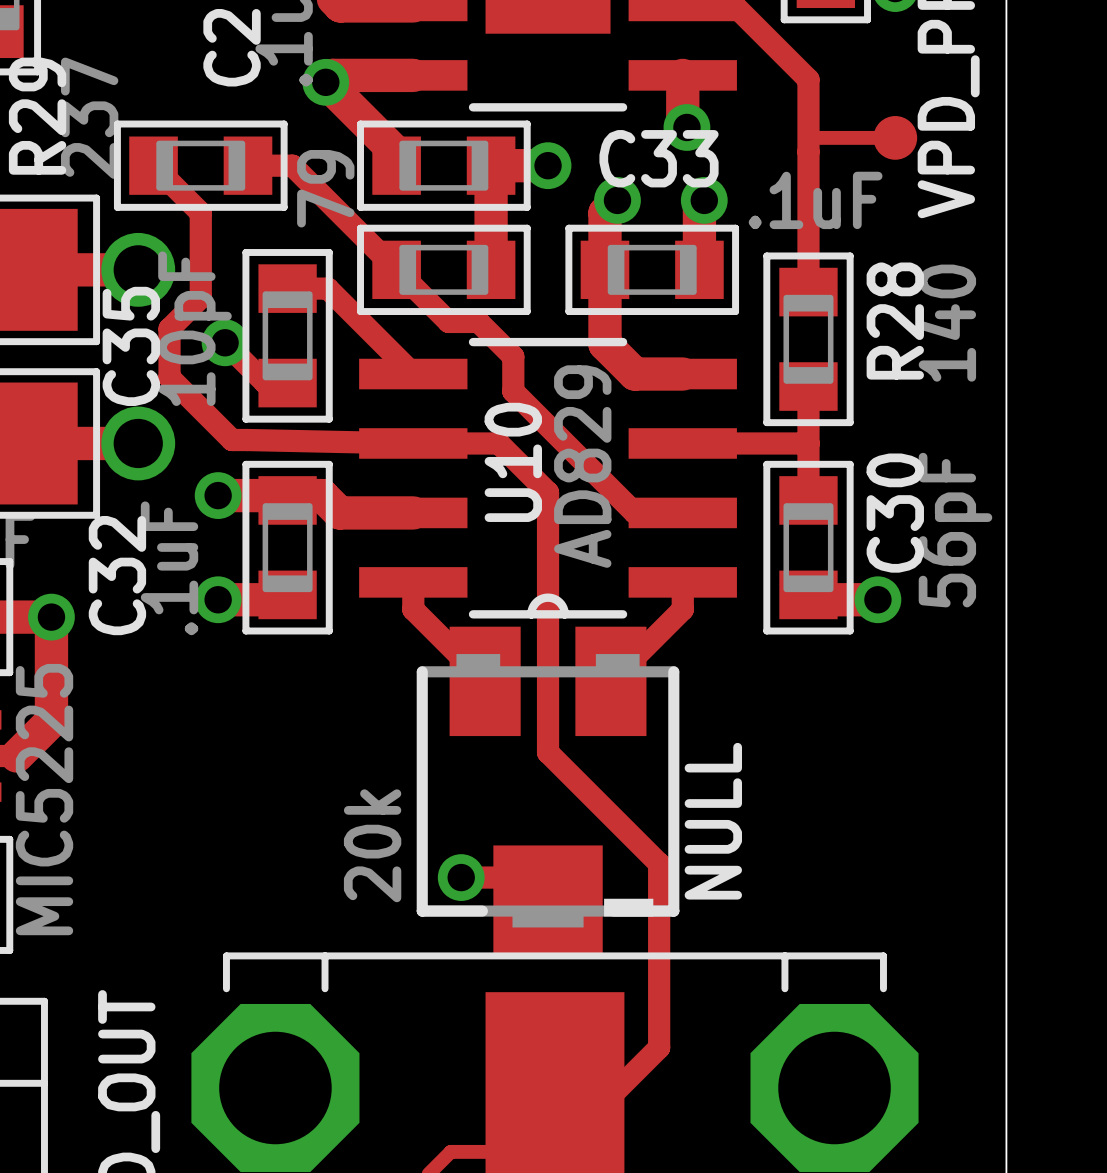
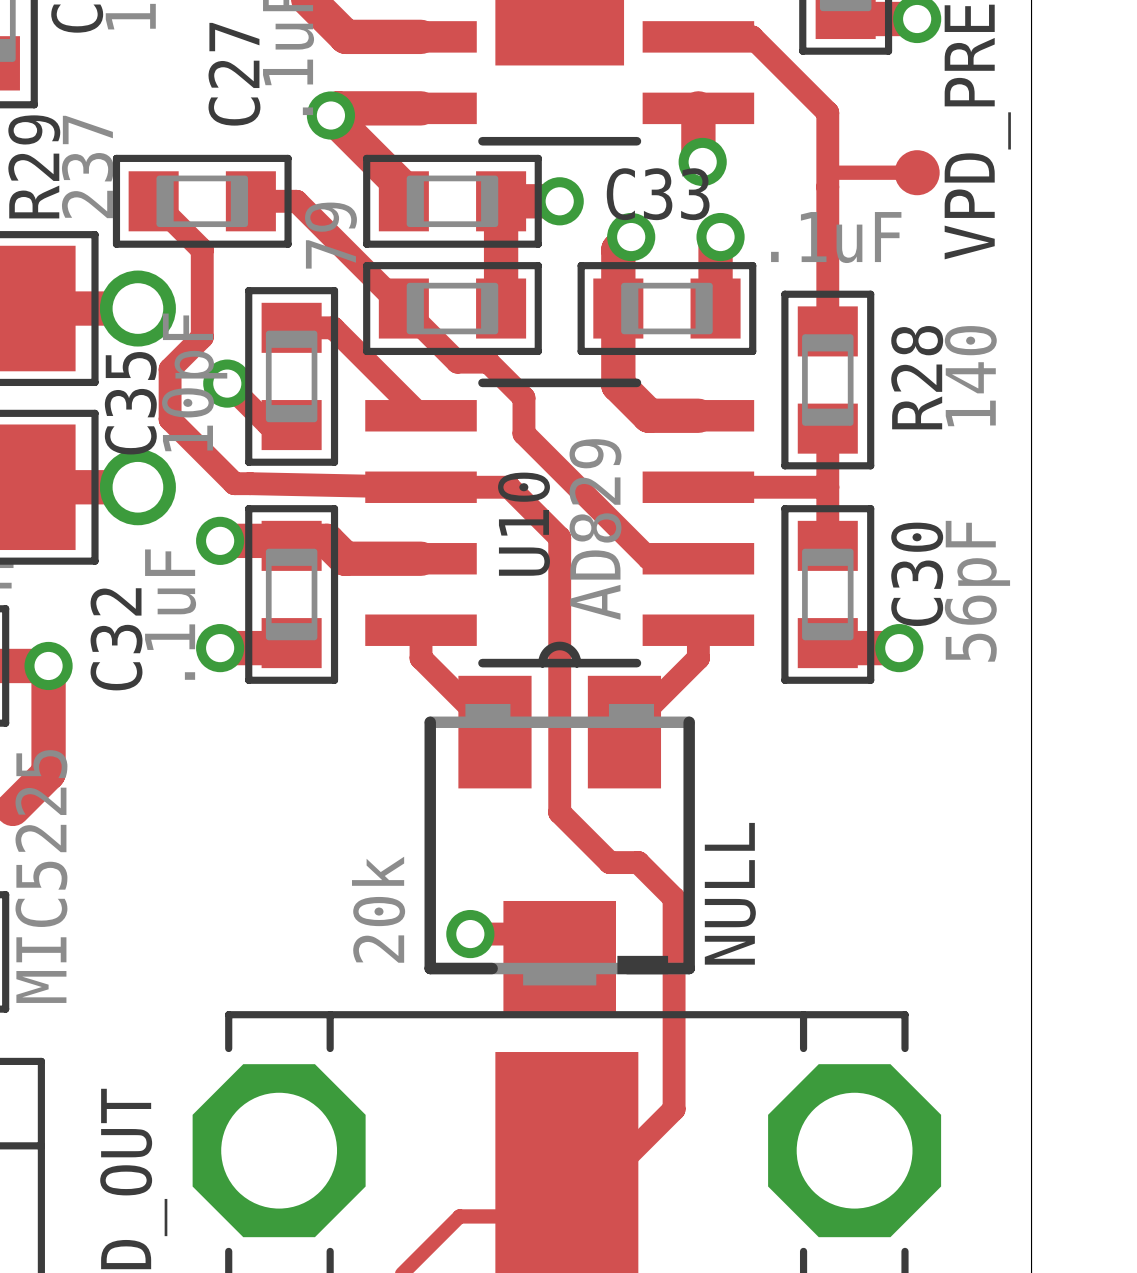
track: (548, 752) (659, 863) -> (559, 805) (559, 812) (609, 862) (638, 862) (674, 898) (674, 919)

